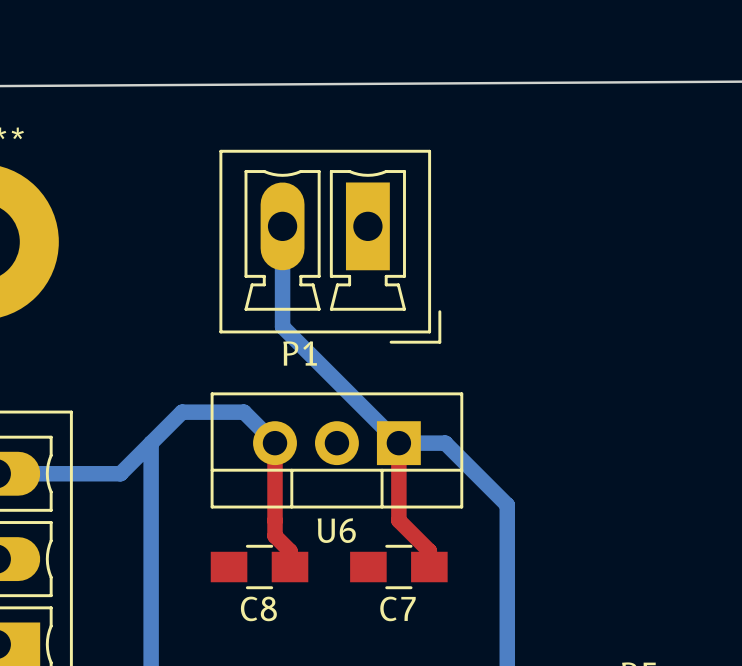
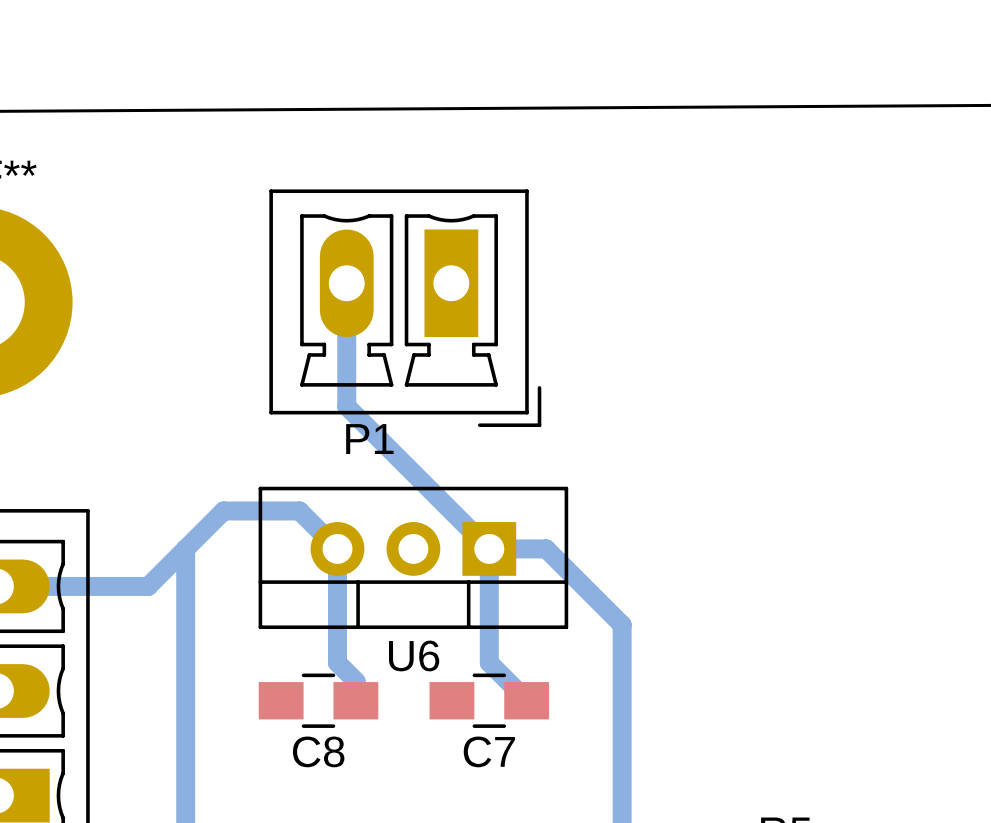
top track: (275, 443) (275, 536) (290, 551) (290, 567) -> none
bottom track: none -> (337, 548) (337, 662) (356, 681)
top track: (398, 443) (398, 520) (429, 551) (429, 567) -> none
bottom track: none -> (489, 548) (489, 662) (527, 700)

